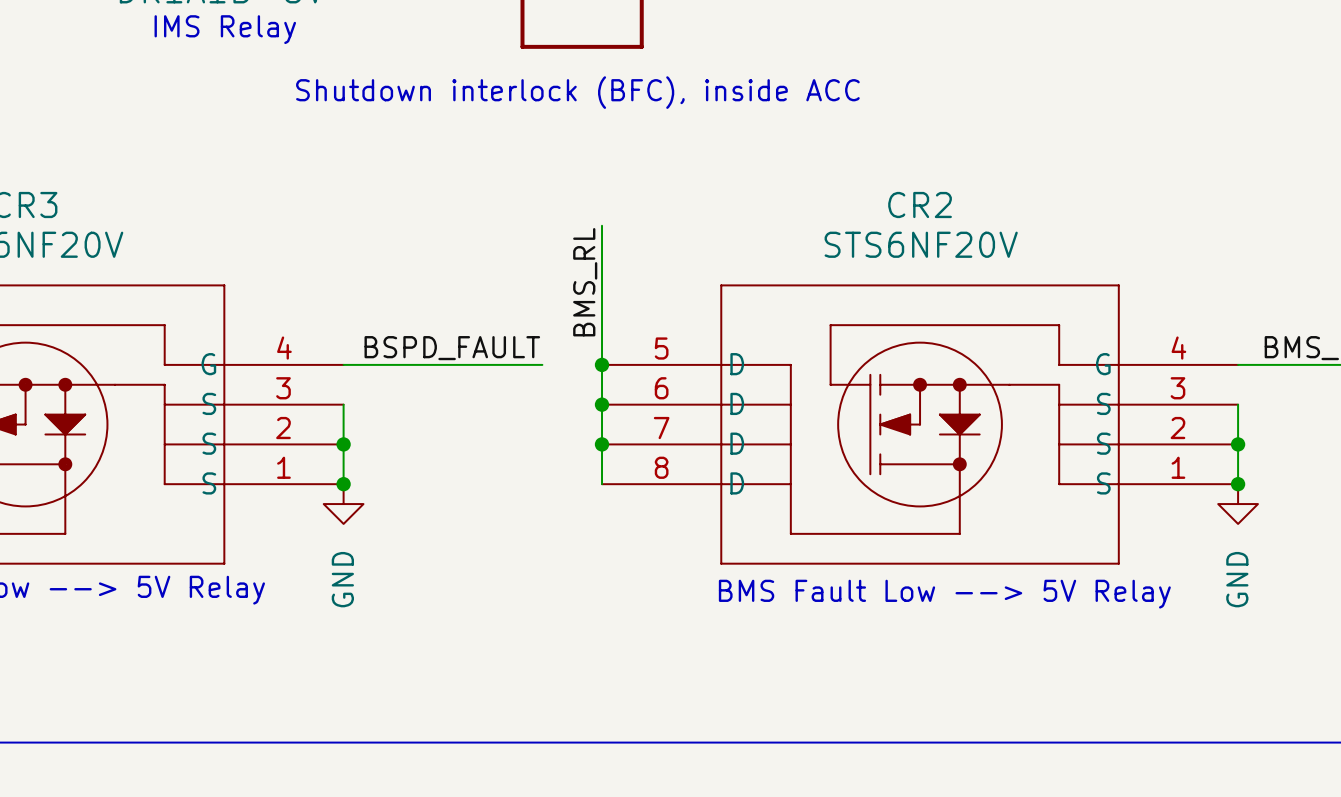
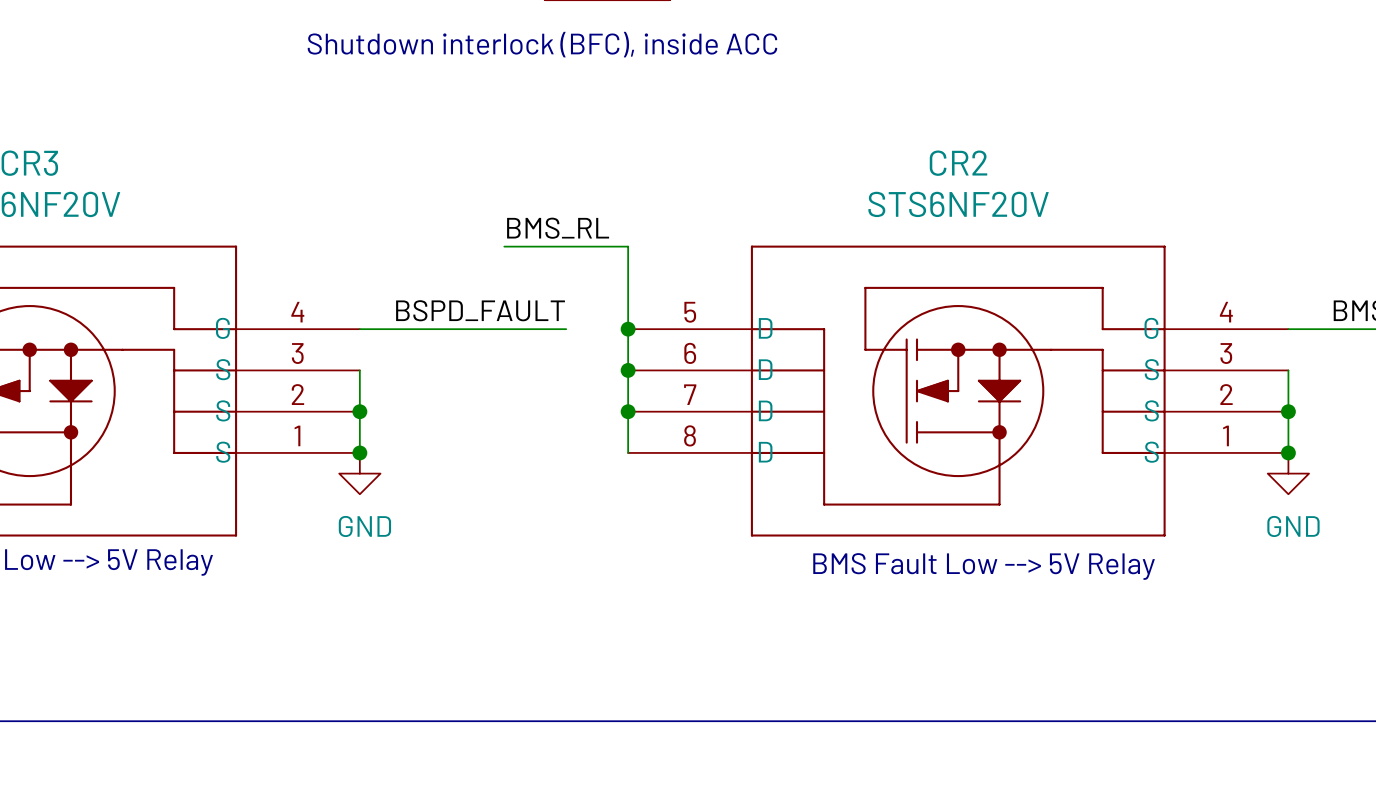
wire: (602, 225) (602, 285) -> (504, 246) (628, 246)
label rotation: 0° (585, 282) -> 90° clockwise (558, 228)
power symbol text rotation: 0° (342, 579) -> 90° clockwise (364, 526)
power symbol text rotation: 0° (1237, 579) -> 90° clockwise (1293, 526)

